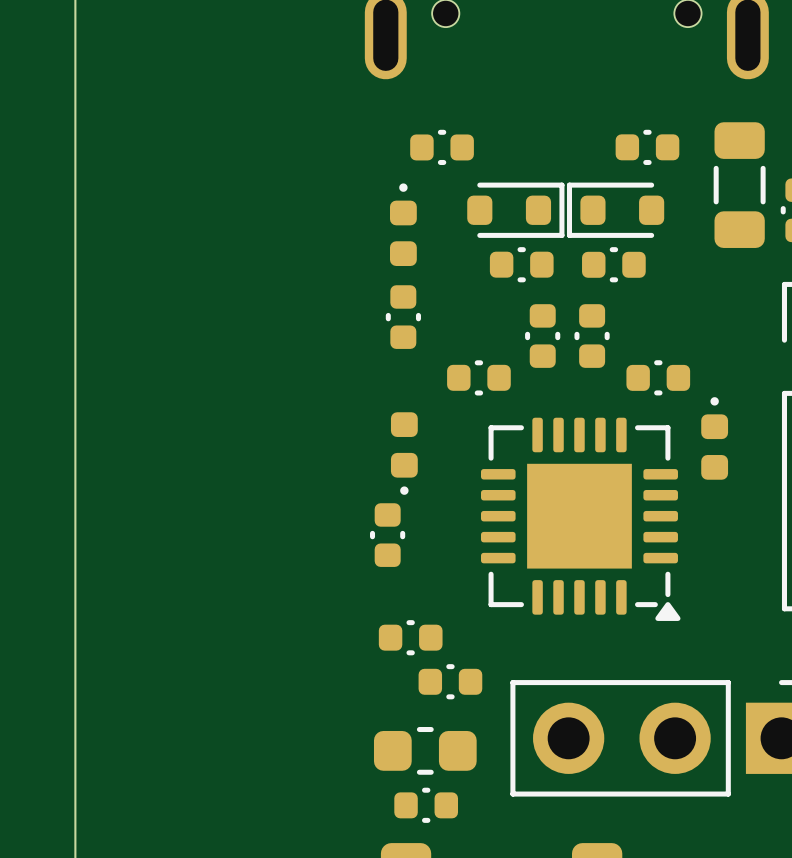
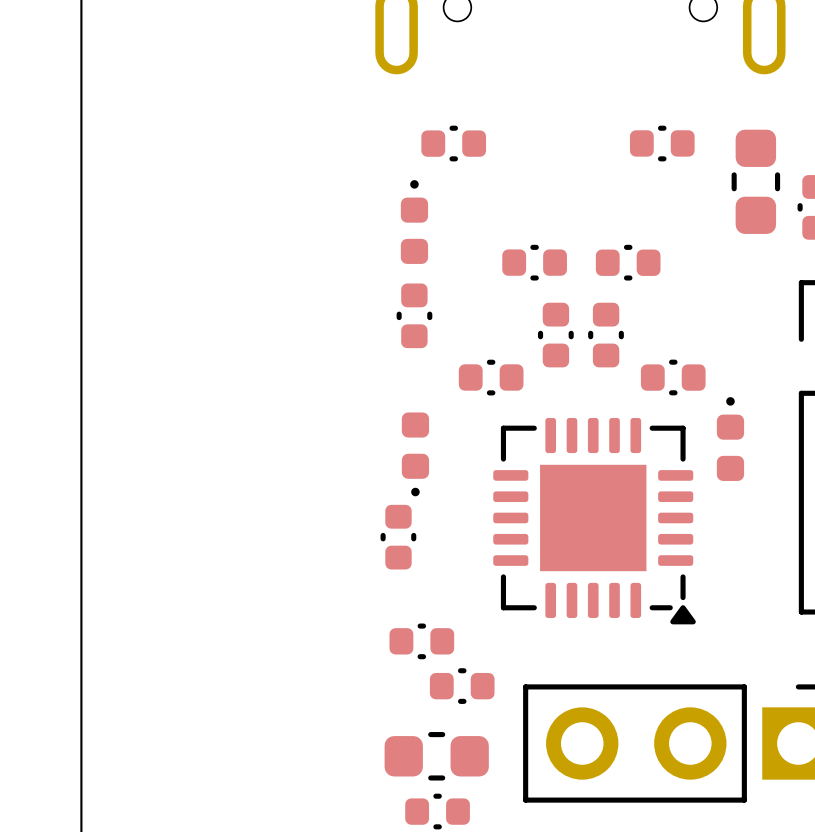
part footprint: [713, 122, 766, 248] -> [731, 129, 781, 234]
part: (515, 210) -> none
part: (615, 210) -> none

